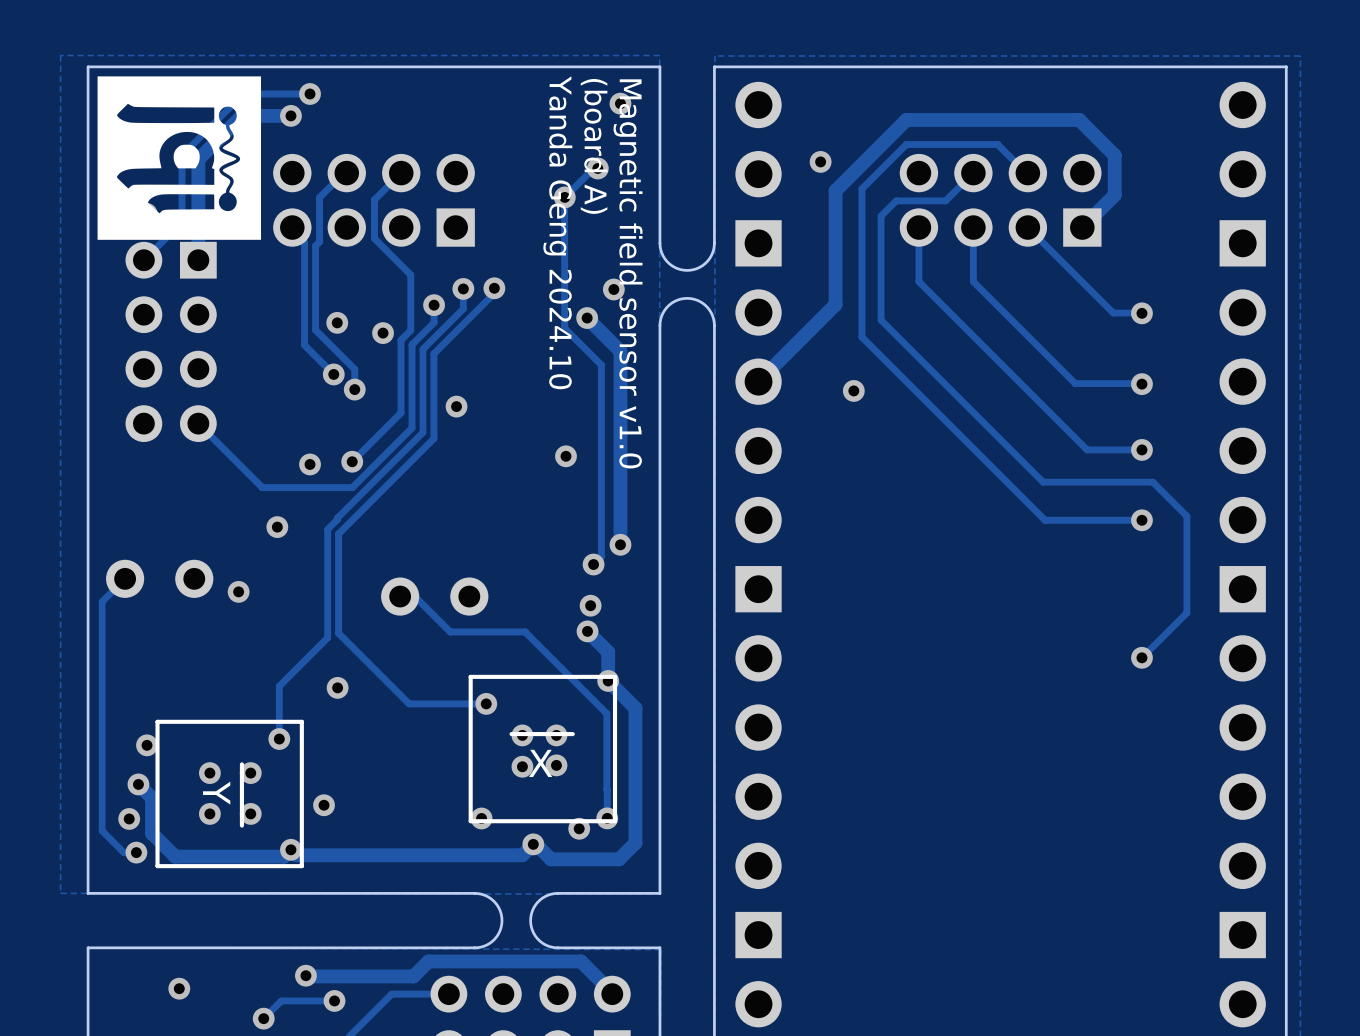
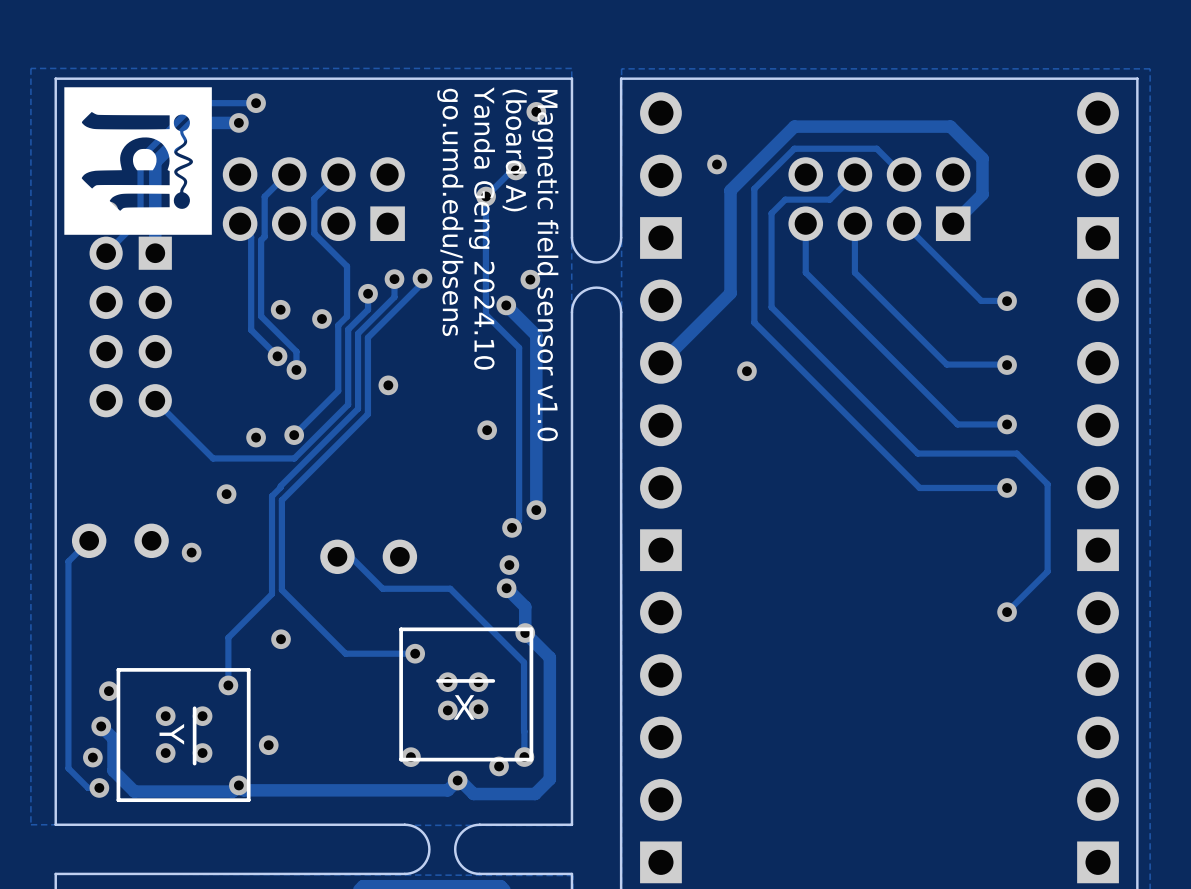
text: (board A) (594, 146) -> Yanda Geng 2024.10 (481, 228)
text: Yanda Geng 2024.10 (557, 232) -> go.umd.edu/bsens (450, 212)
text: Magnetic field sensor v1.0 (628, 273) -> (board A) (514, 150)
text: none -> Magnetic field sensor v1.0 (545, 265)

